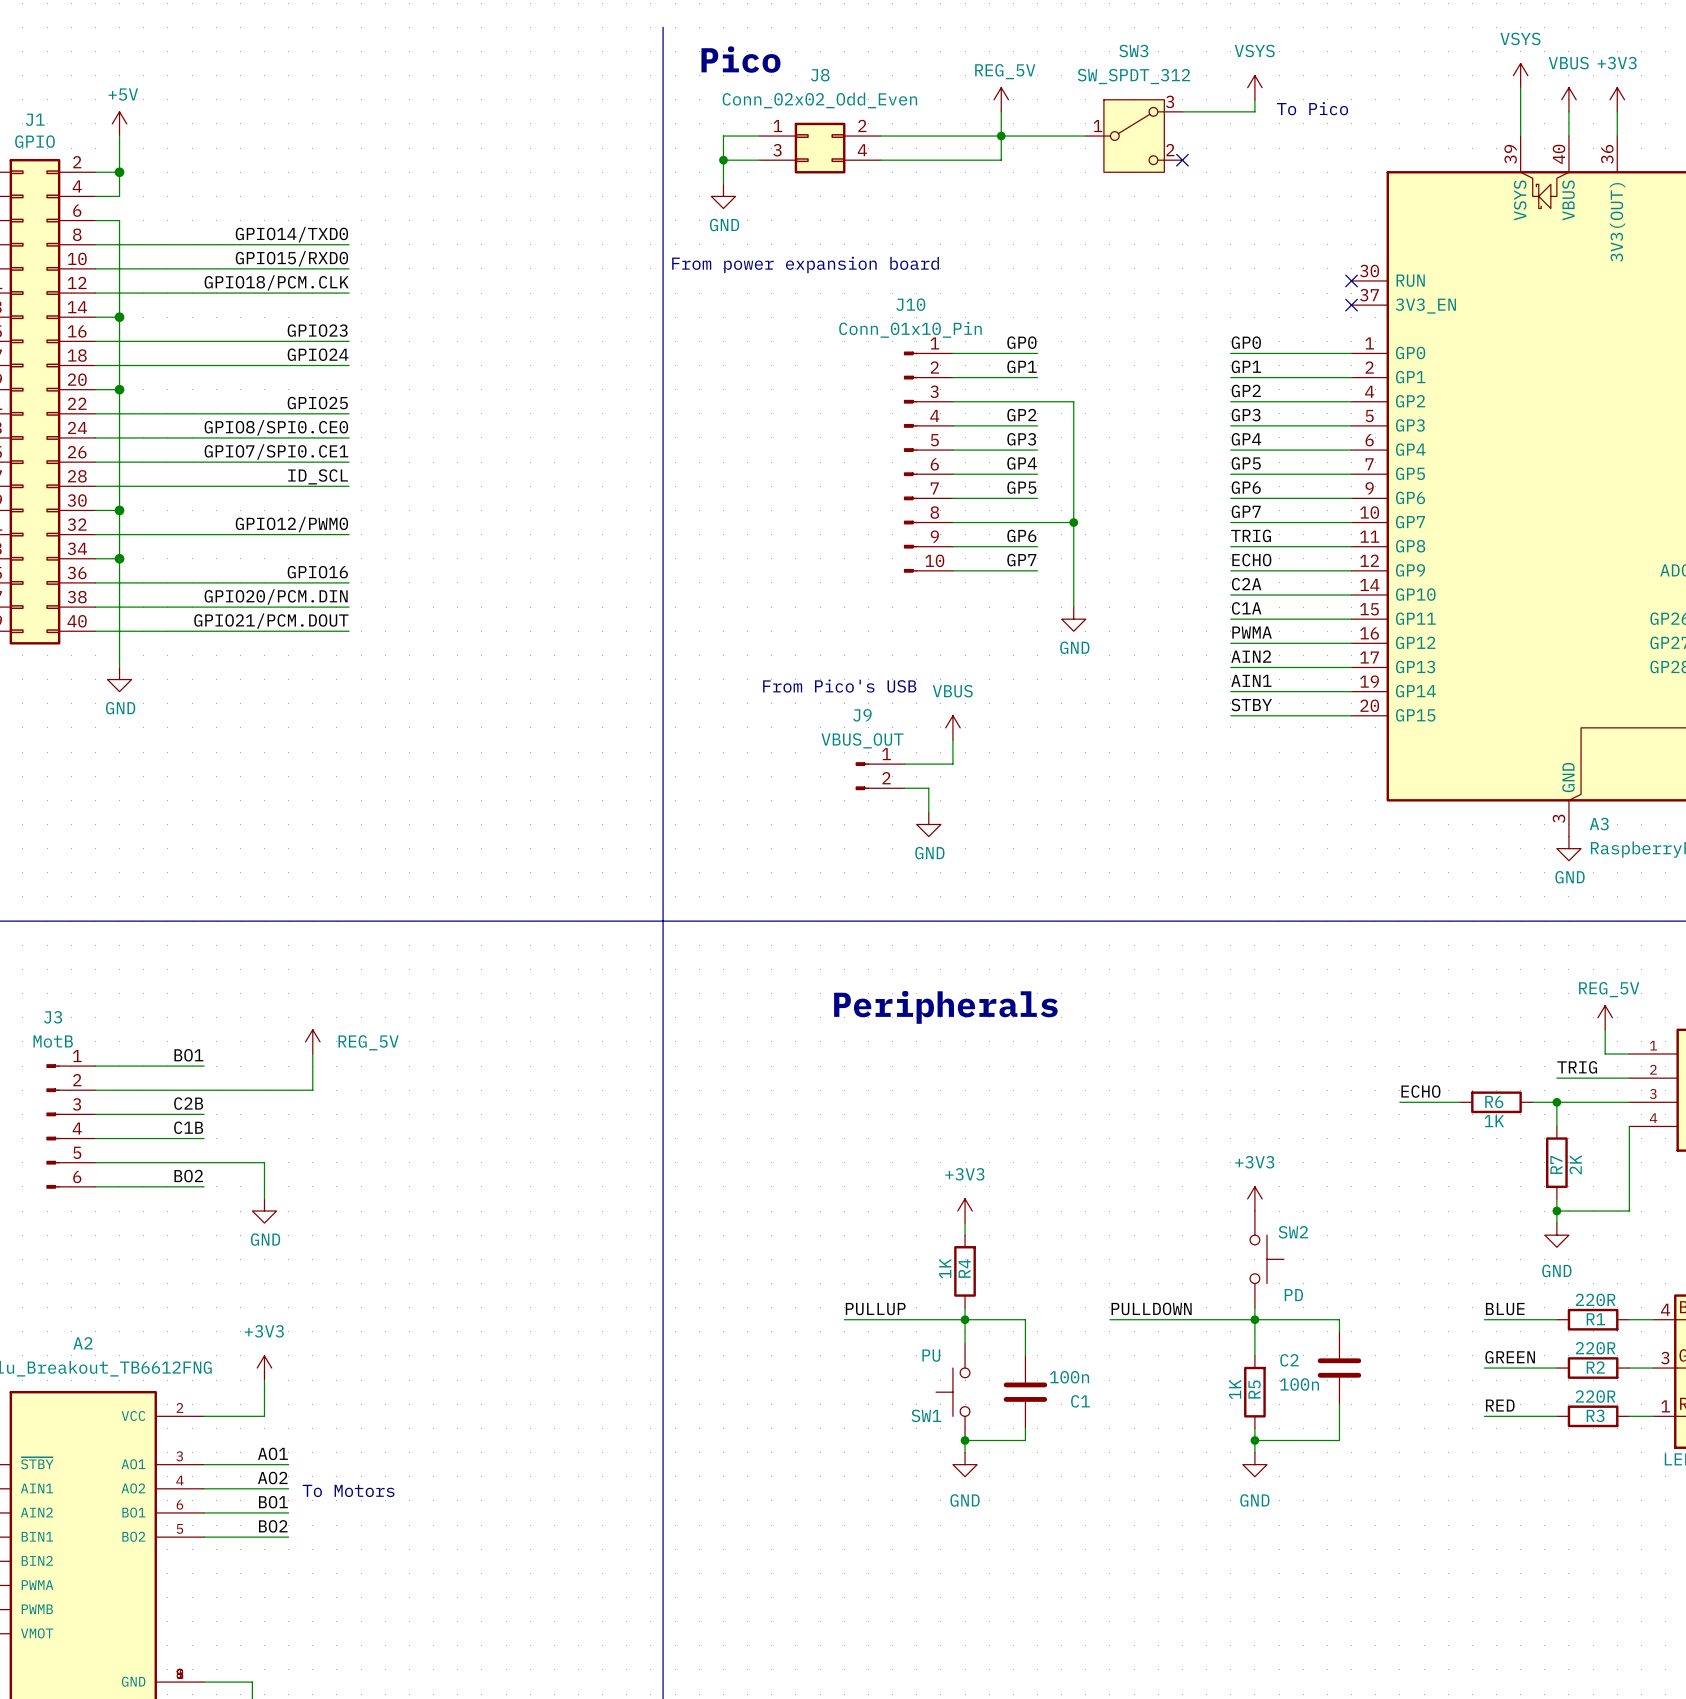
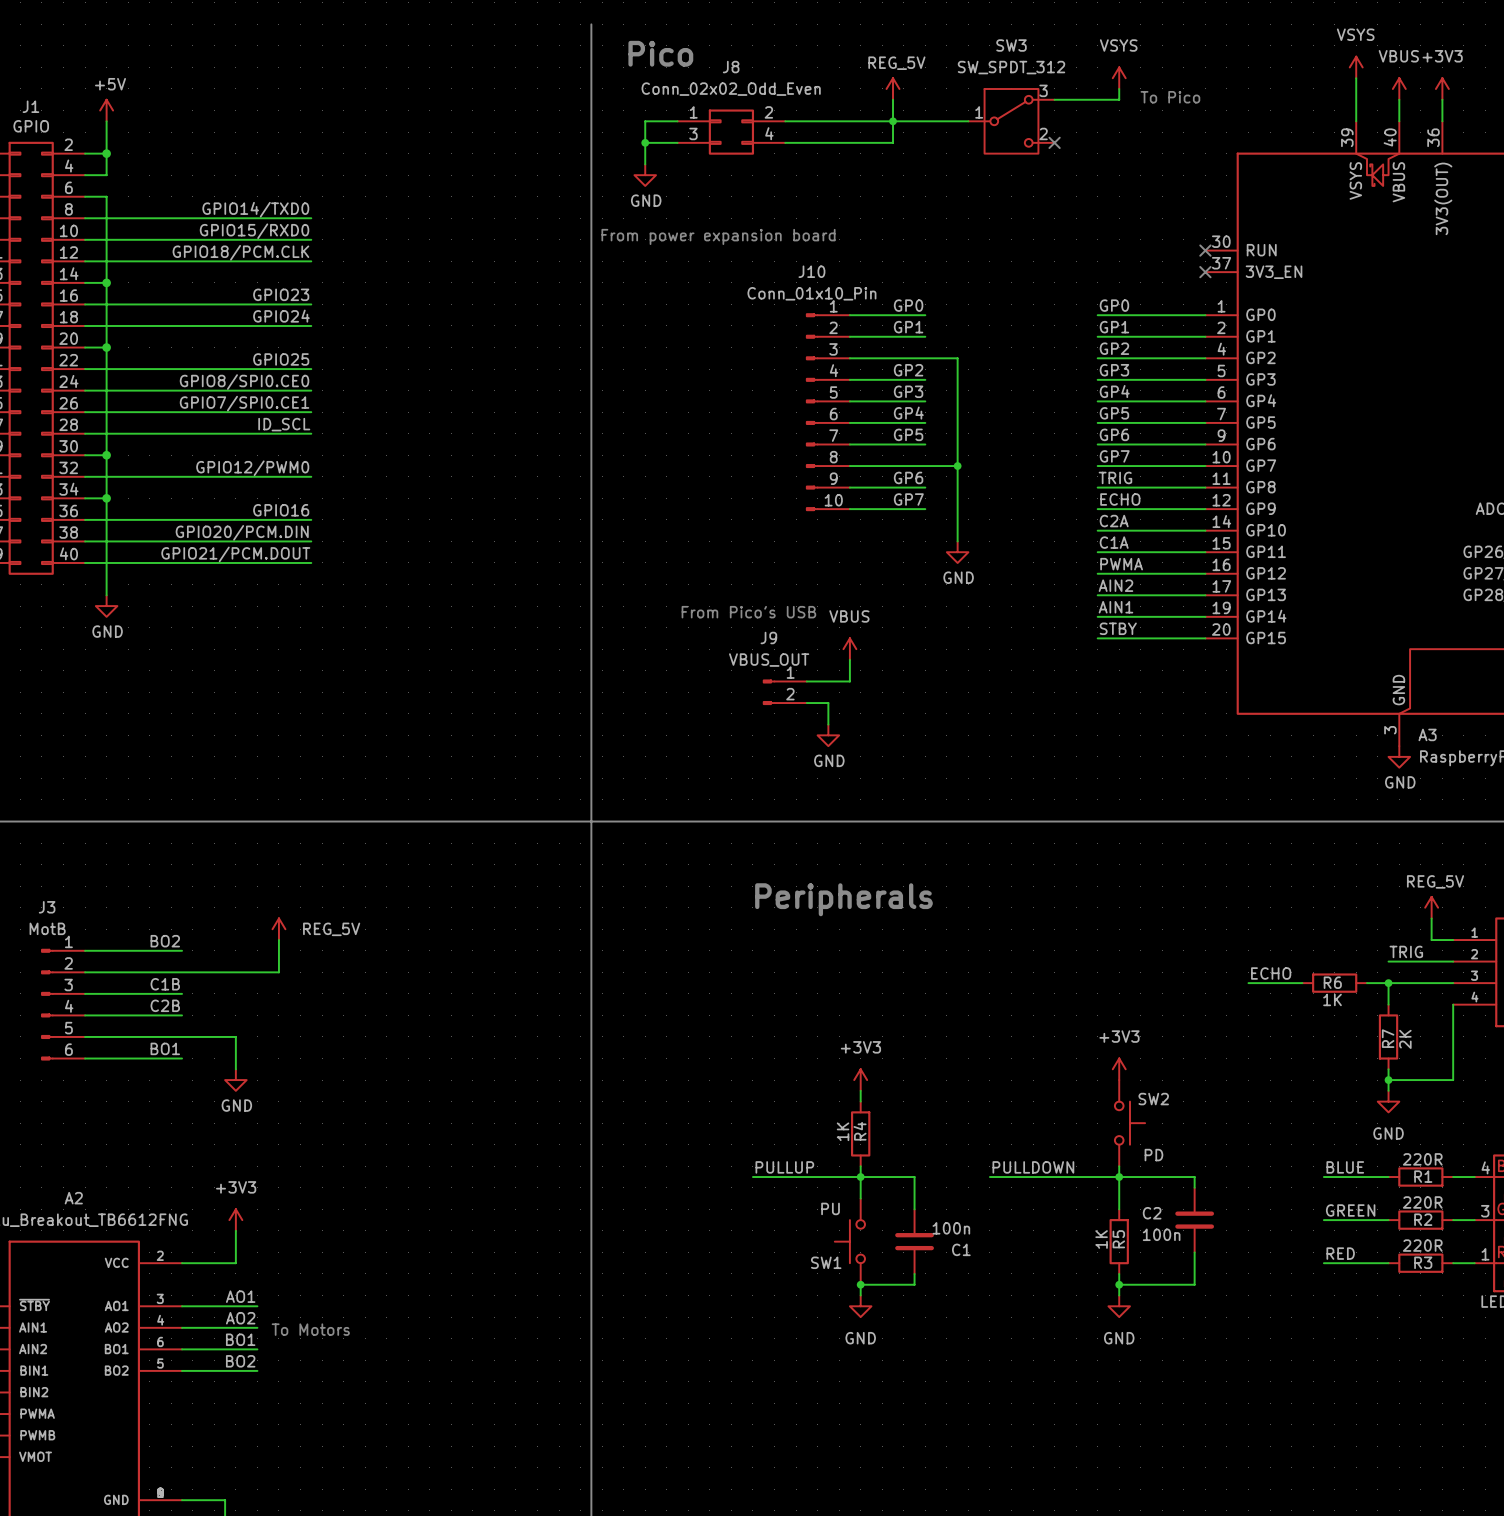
label: BO1 (188, 1055) -> BO2 (165, 941)
label: C2B (188, 1103) -> C1B (165, 984)
label: C1B (188, 1127) -> C2B (165, 1005)
label: BO2 (188, 1176) -> BO1 (165, 1048)

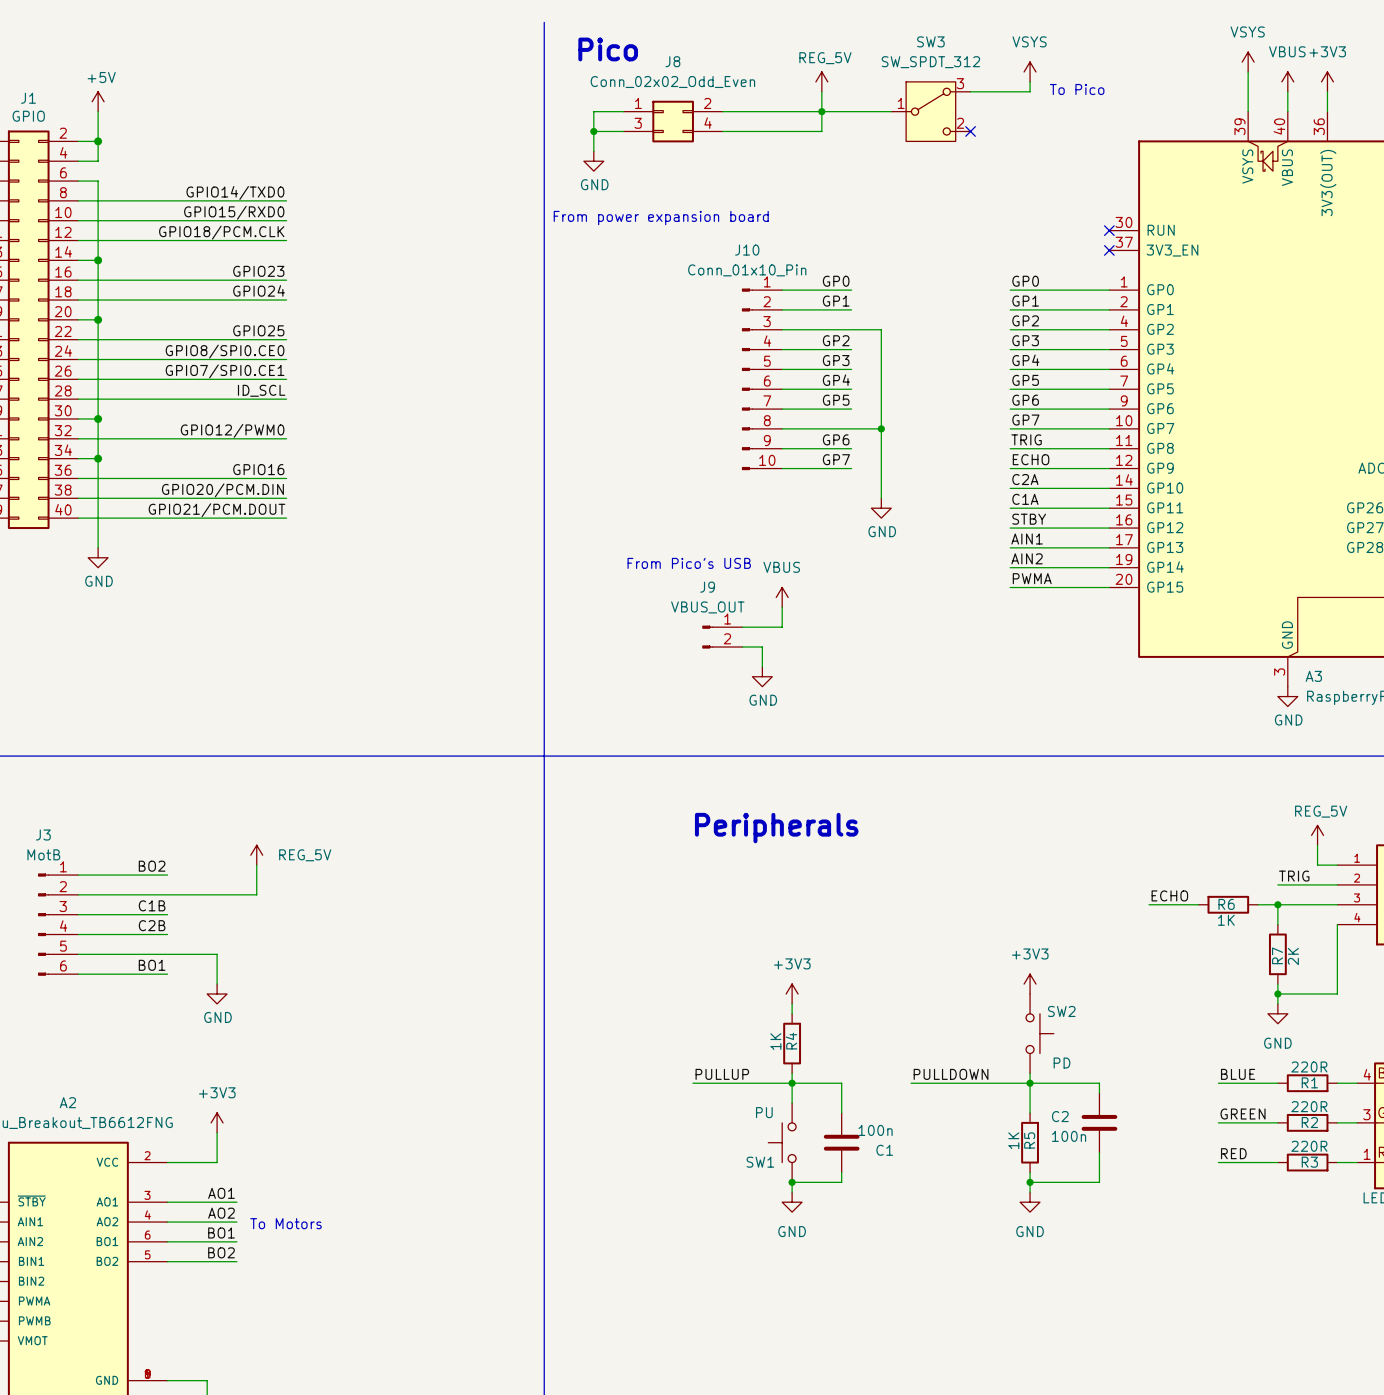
label: PWMA (1121, 564) -> STBY (1029, 519)
label: AIN2 (1115, 585) -> AIN1 (1027, 539)
label: AIN1 (1115, 607) -> AIN2 (1027, 558)
label: STBY (1118, 628) -> PWMA (1032, 578)

